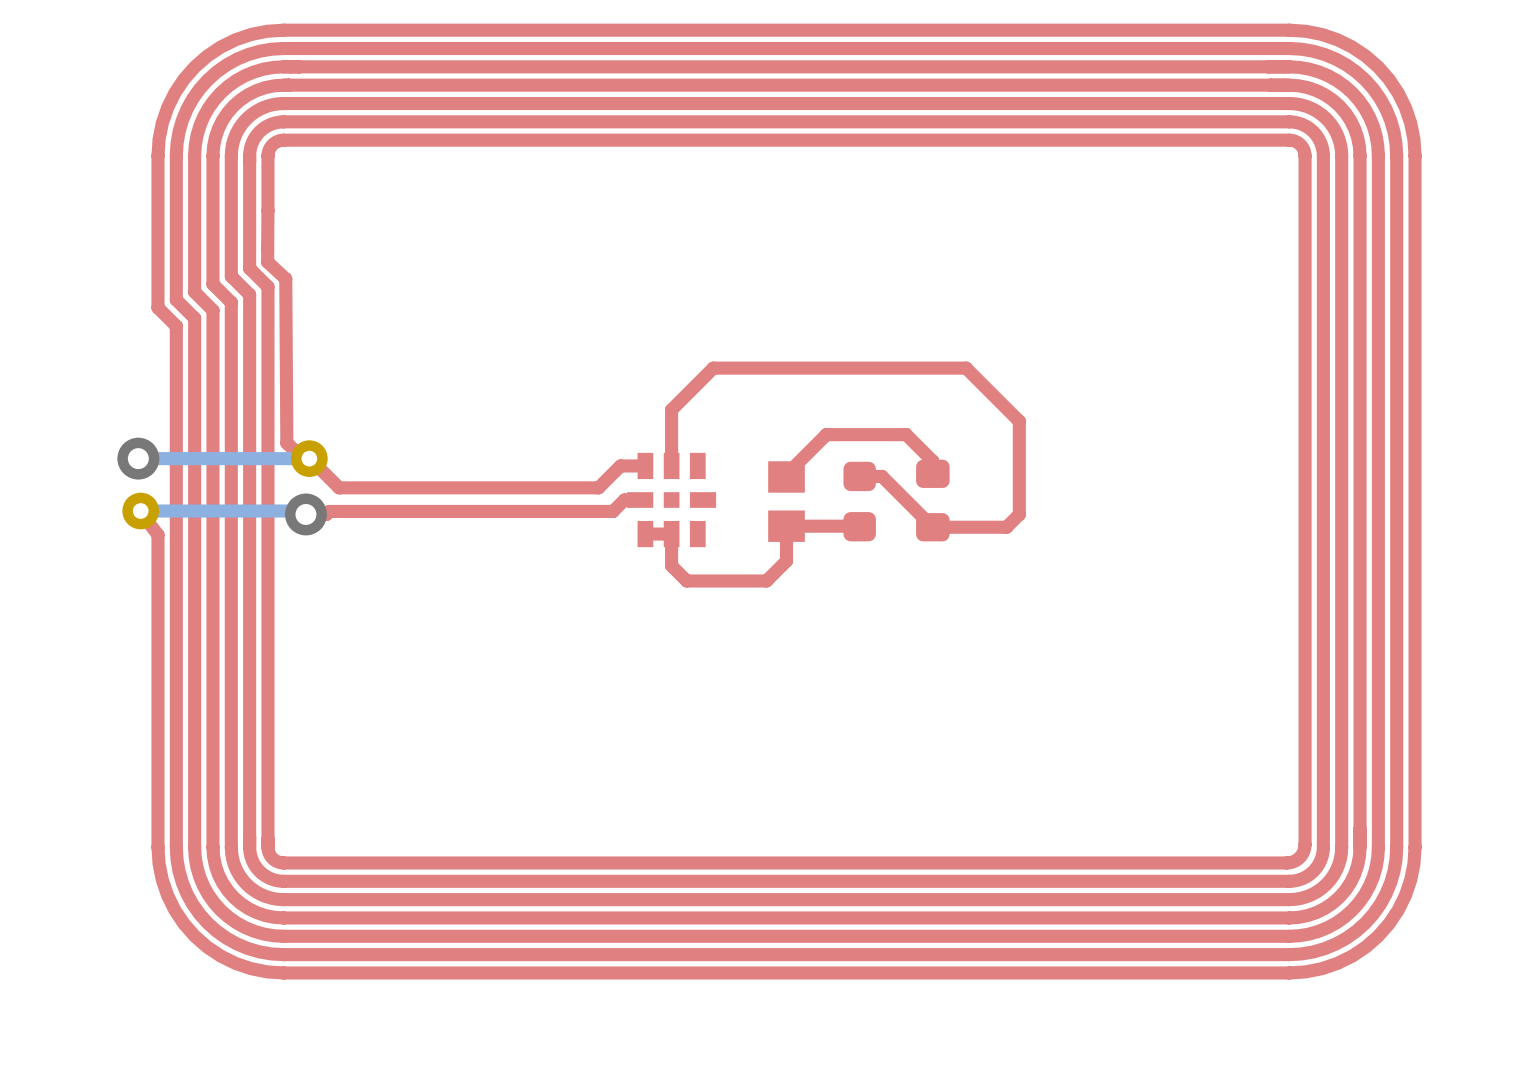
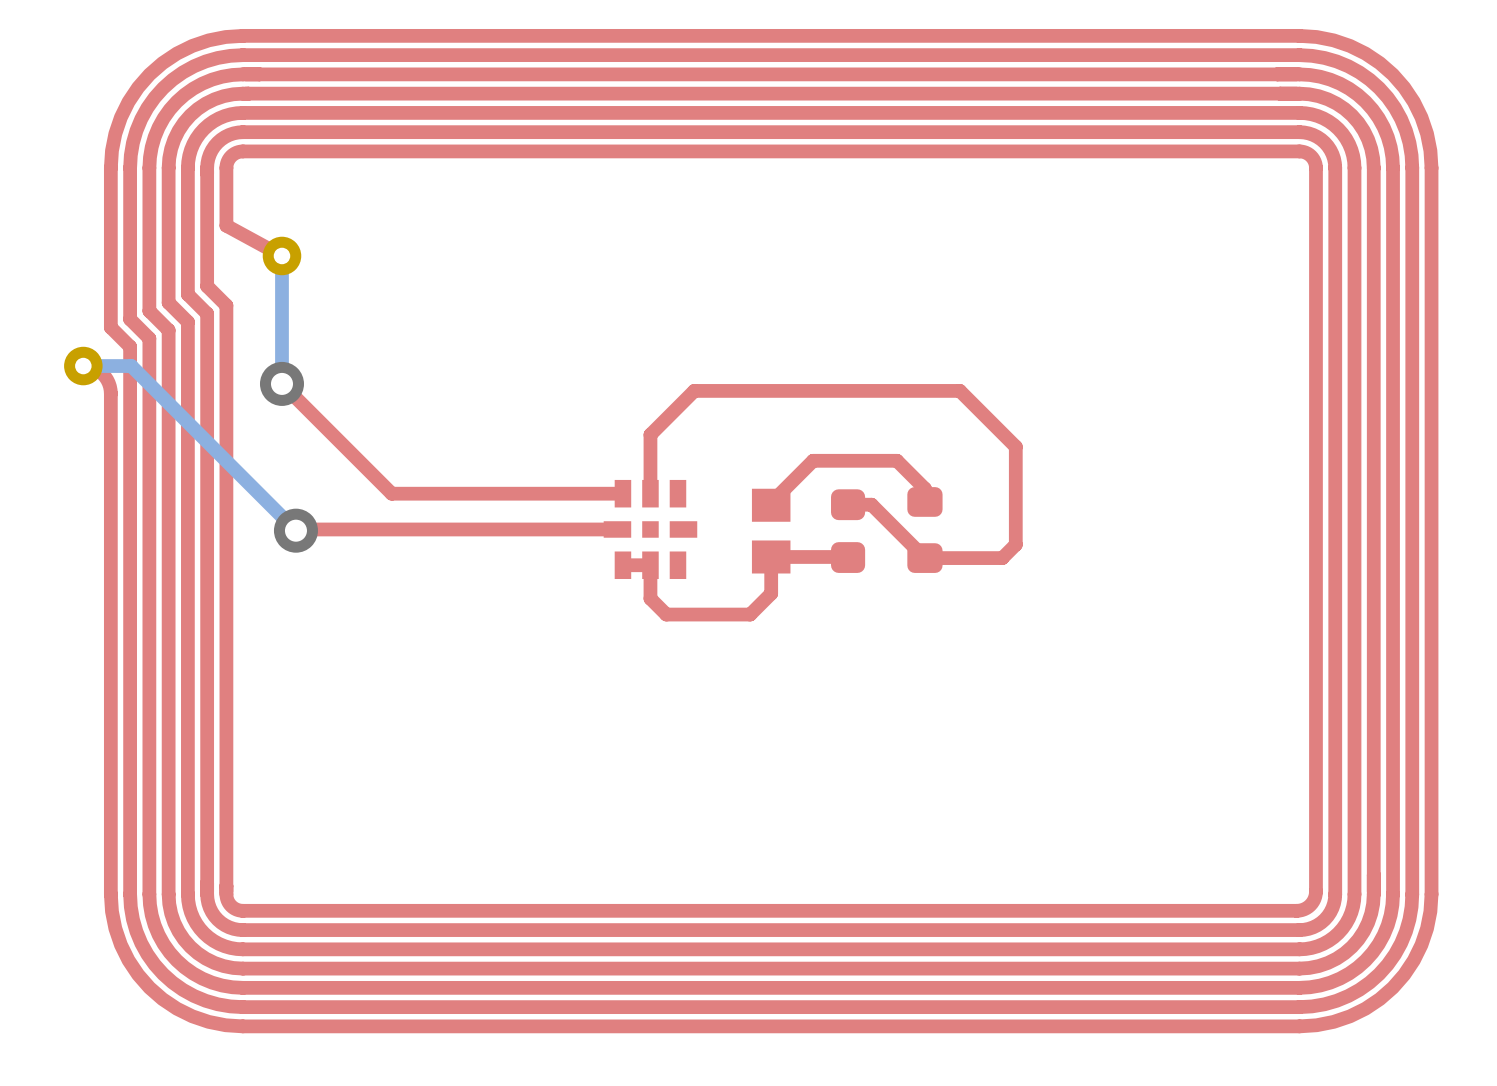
part footprint: [122, 23, 1422, 980] -> [64, 28, 1439, 1034]
bottom track: none -> (281, 255) (281, 383)
bottom track: none -> (83, 366) (131, 366) (295, 530)
via: none -> (281, 383)
via: (138, 458) -> none
bottom track: (309, 458) (138, 458) -> none
top track: (316, 465) (339, 487) (598, 487) (620, 465) -> (281, 383) (391, 493) (596, 493)
top track: (624, 500) (613, 511) (329, 511) (326, 514) (305, 514) -> (600, 529) (295, 530)
bottom track: (140, 511) (302, 511) (305, 514) -> none
via position: (305, 514) -> (295, 530)

